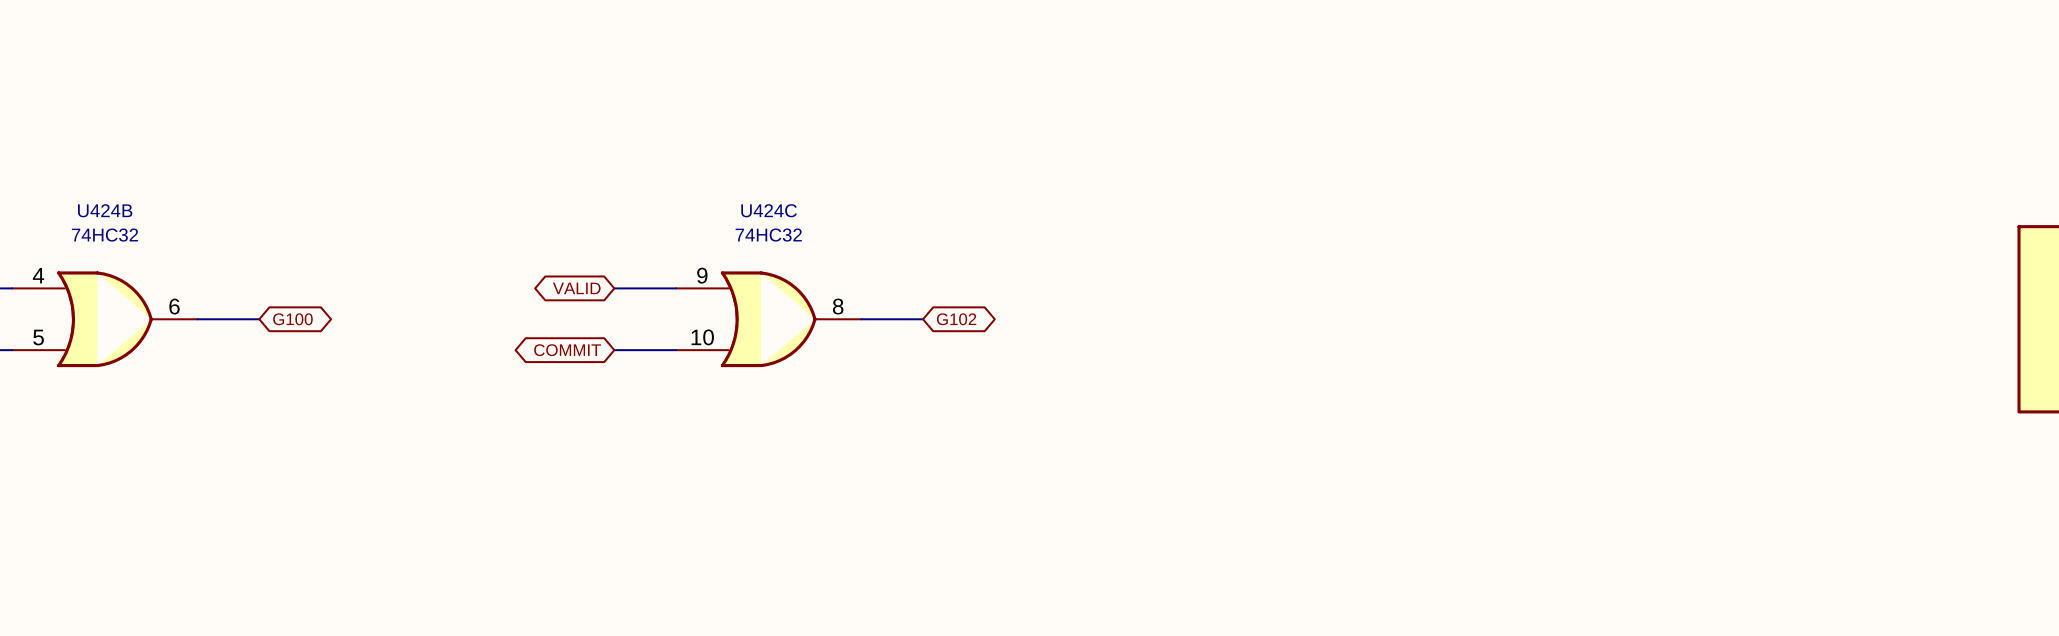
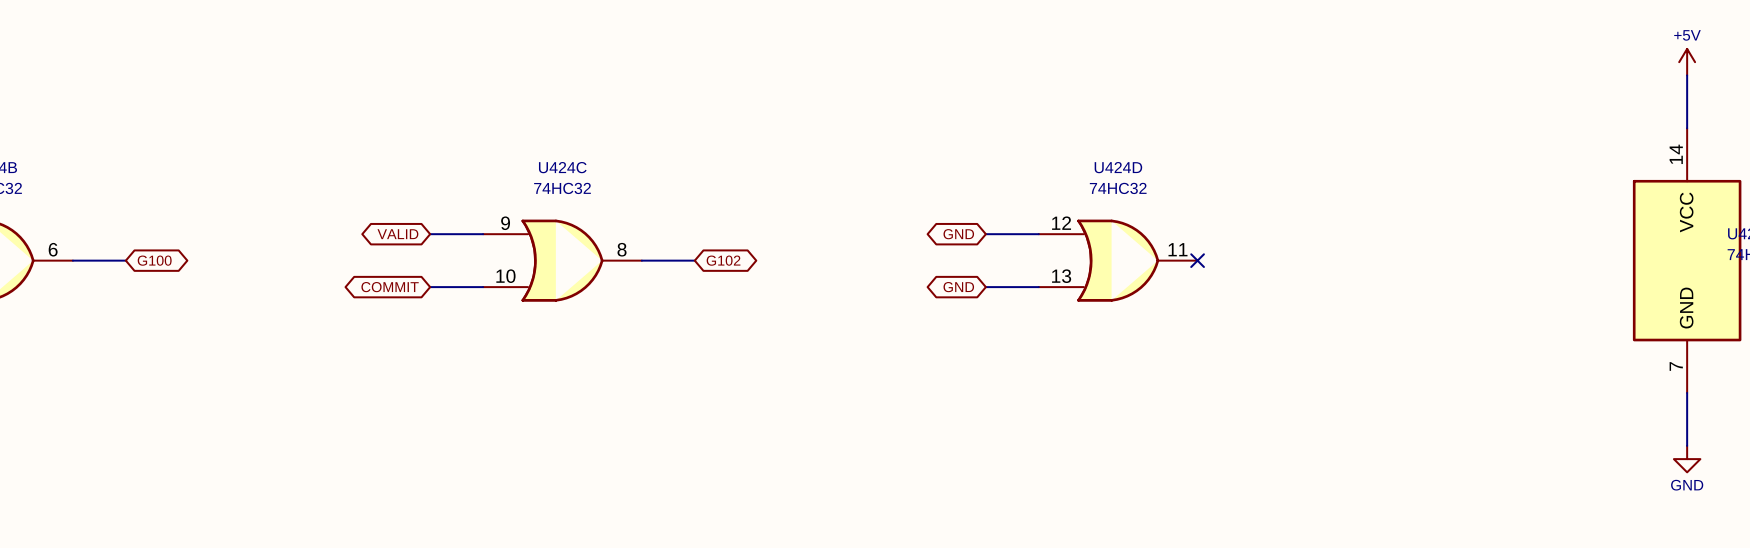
global label: none -> GND (958, 234)
wire: none -> (985, 234) (1038, 234)
U424D: none -> 74HC32 (1118, 260)
no-connect mark: none -> (1197, 260)
global label: none -> GND (958, 287)
wire: none -> (985, 287) (1038, 287)

